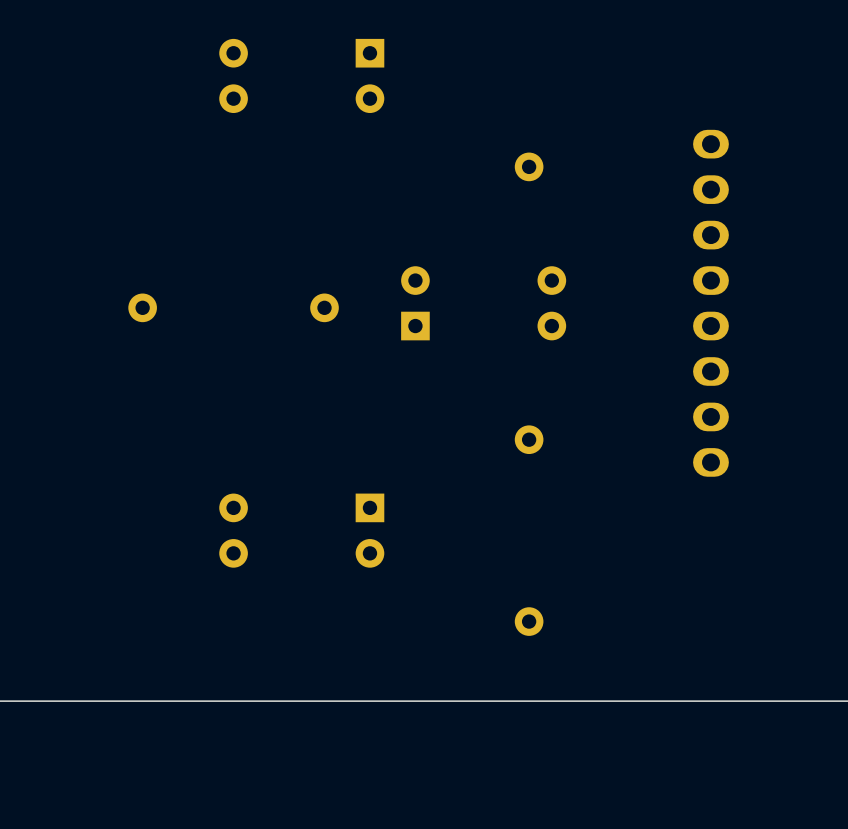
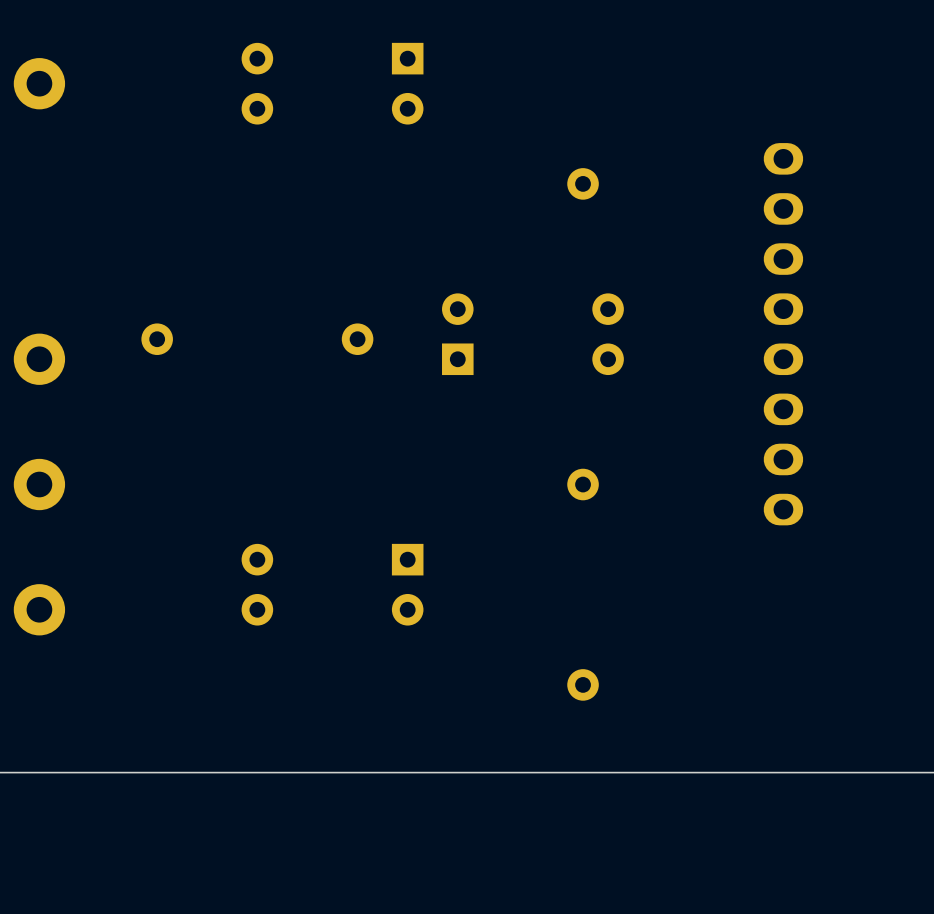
part: none -> (39, 83)
part: none -> (39, 359)
part: none -> (39, 484)
part: none -> (39, 609)

